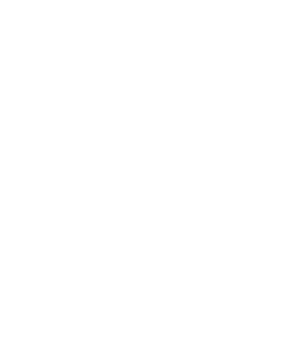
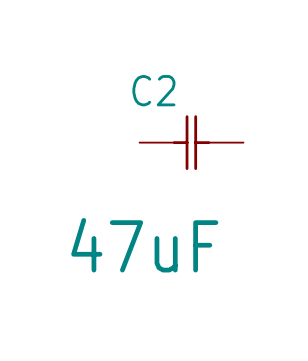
C2: none -> 47uF (191, 142)

